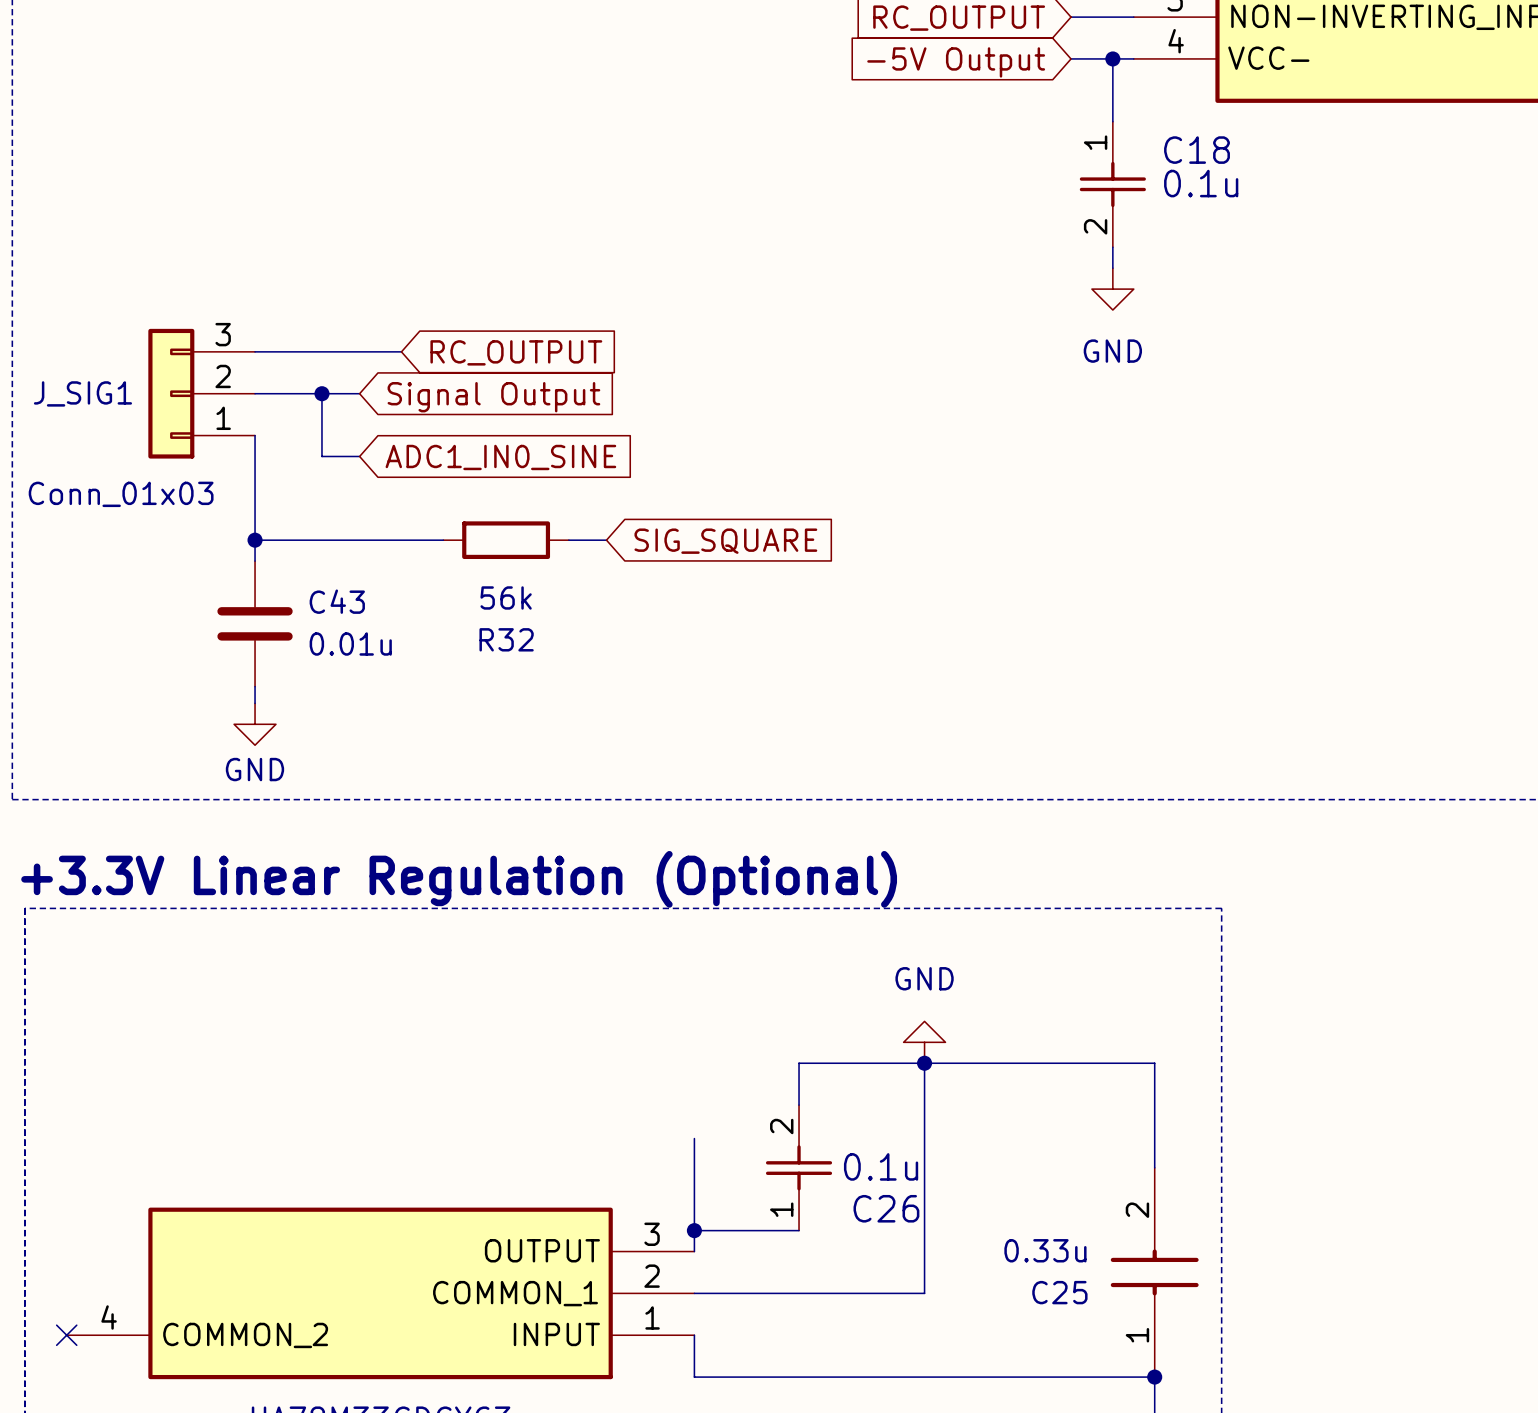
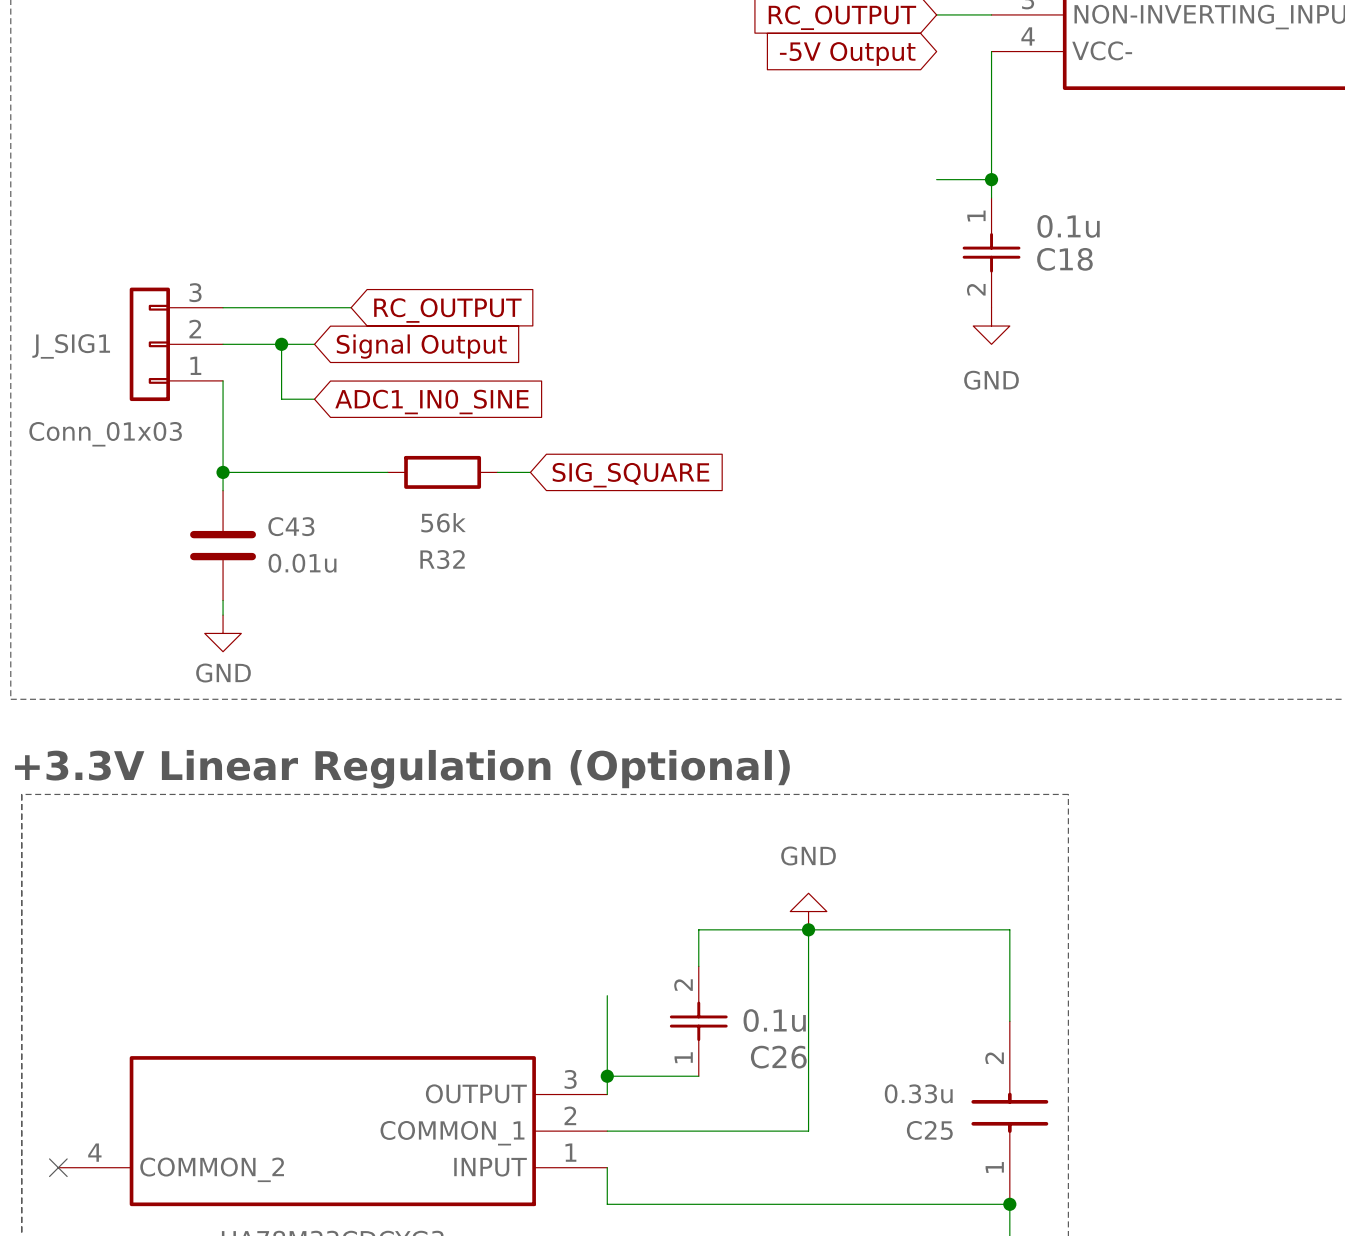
wire: (1071, 58) (1133, 58) -> (991, 197) (991, 51)
wire: (1112, 58) (1112, 121) -> none
junction: (1112, 58) -> none
C18 name position: C18 (1197, 150) -> C18 (1064, 259)
C18 value position: 0.1u (1201, 183) -> 0.1u (1068, 226)
C18 position: (1112, 184) -> (991, 252)
wire: none -> (936, 179) (991, 179)
junction: none -> (991, 179)
wire: (1112, 247) (1112, 268) -> none
power symbol position: GND (1112, 289) -> GND (991, 326)

